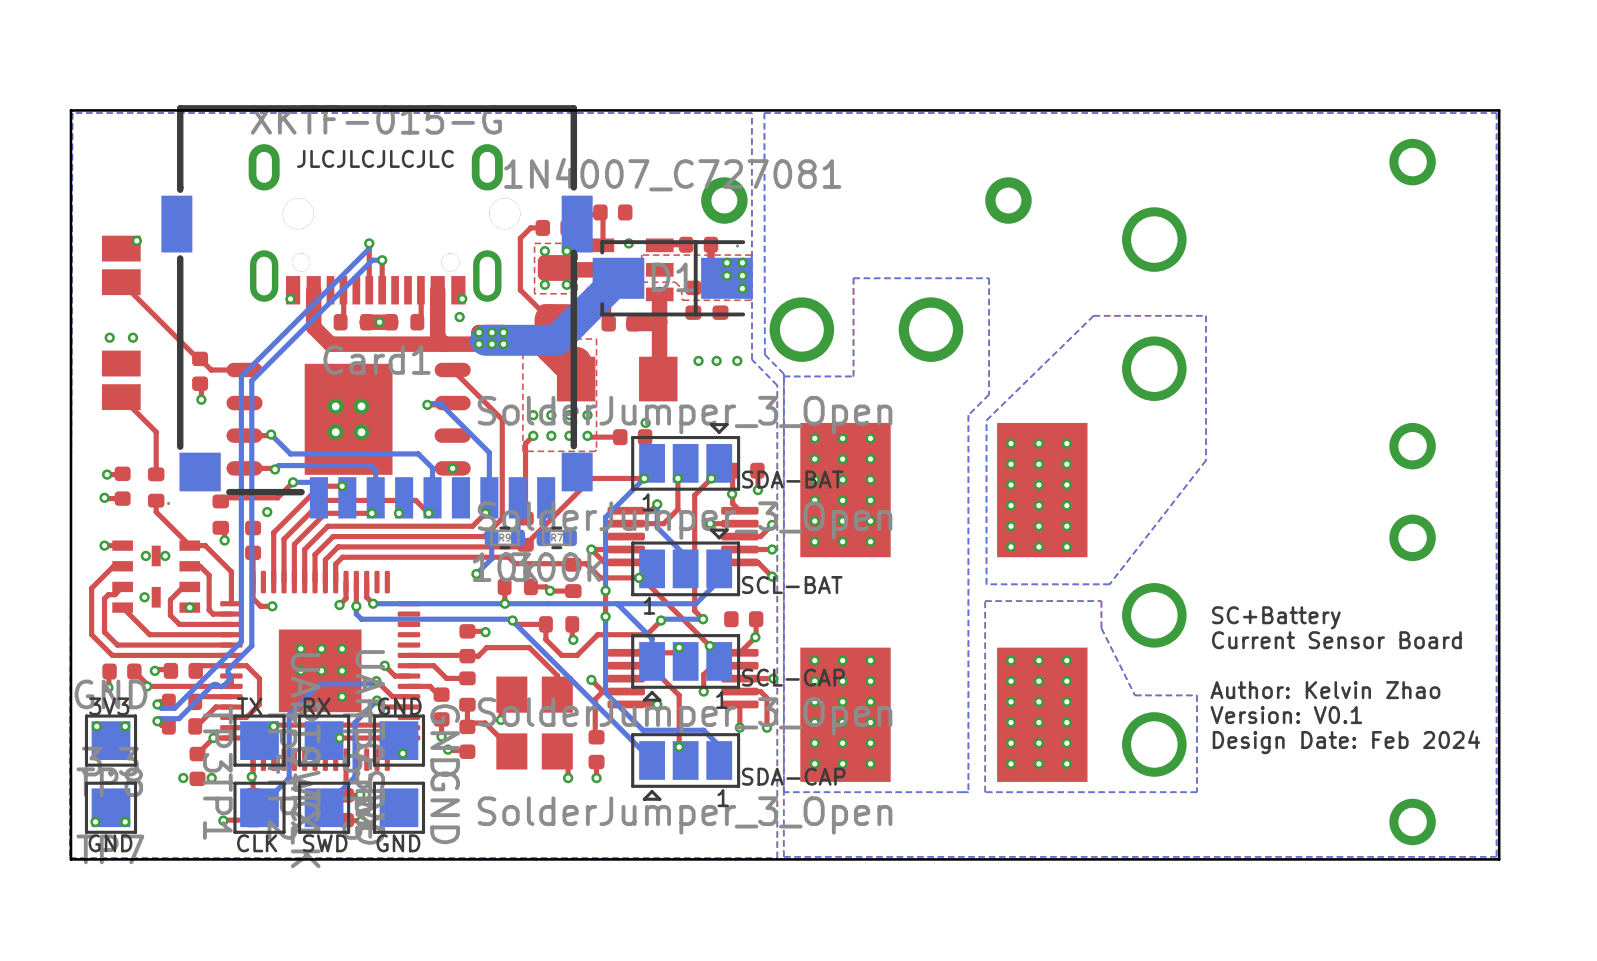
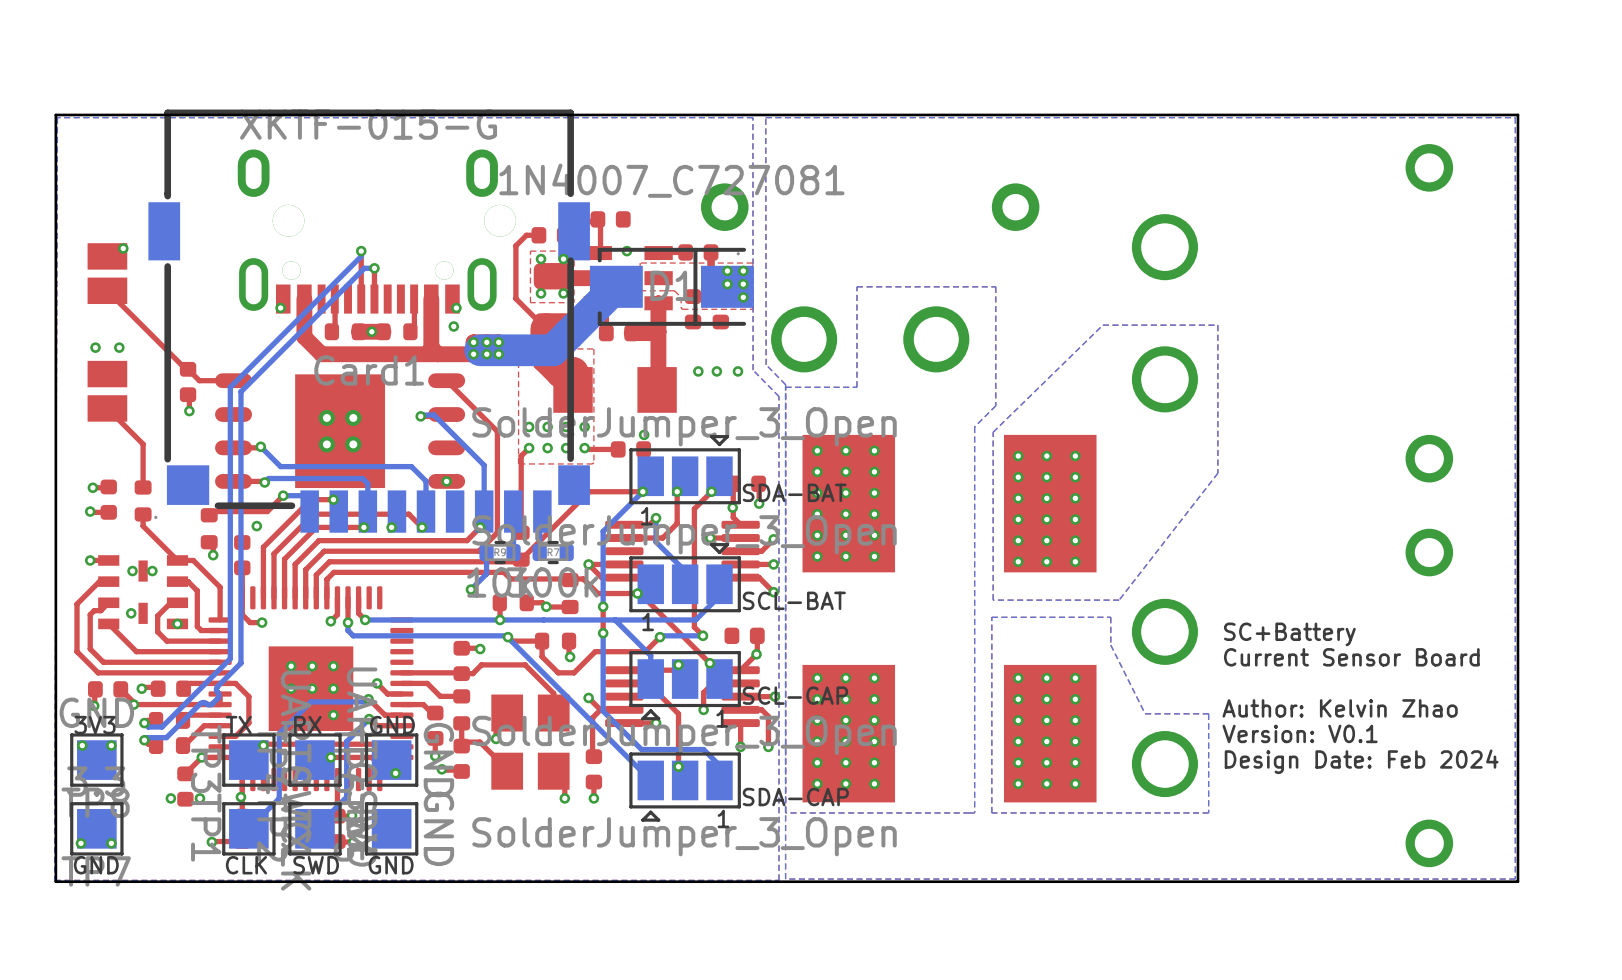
text: JLCJLCJLCJLC (375, 158) -> none

